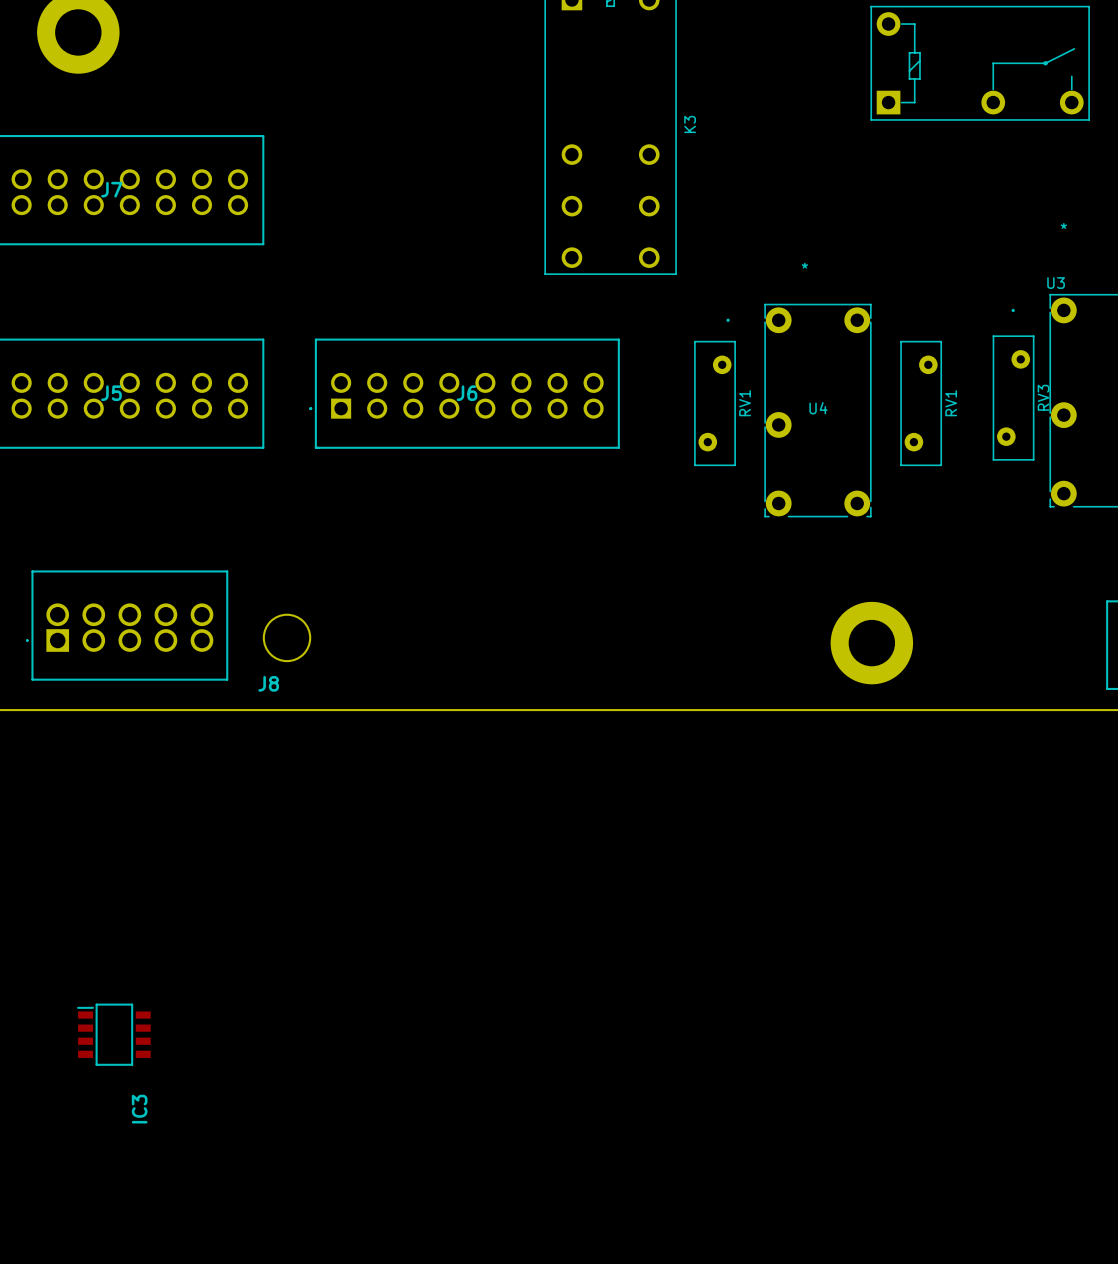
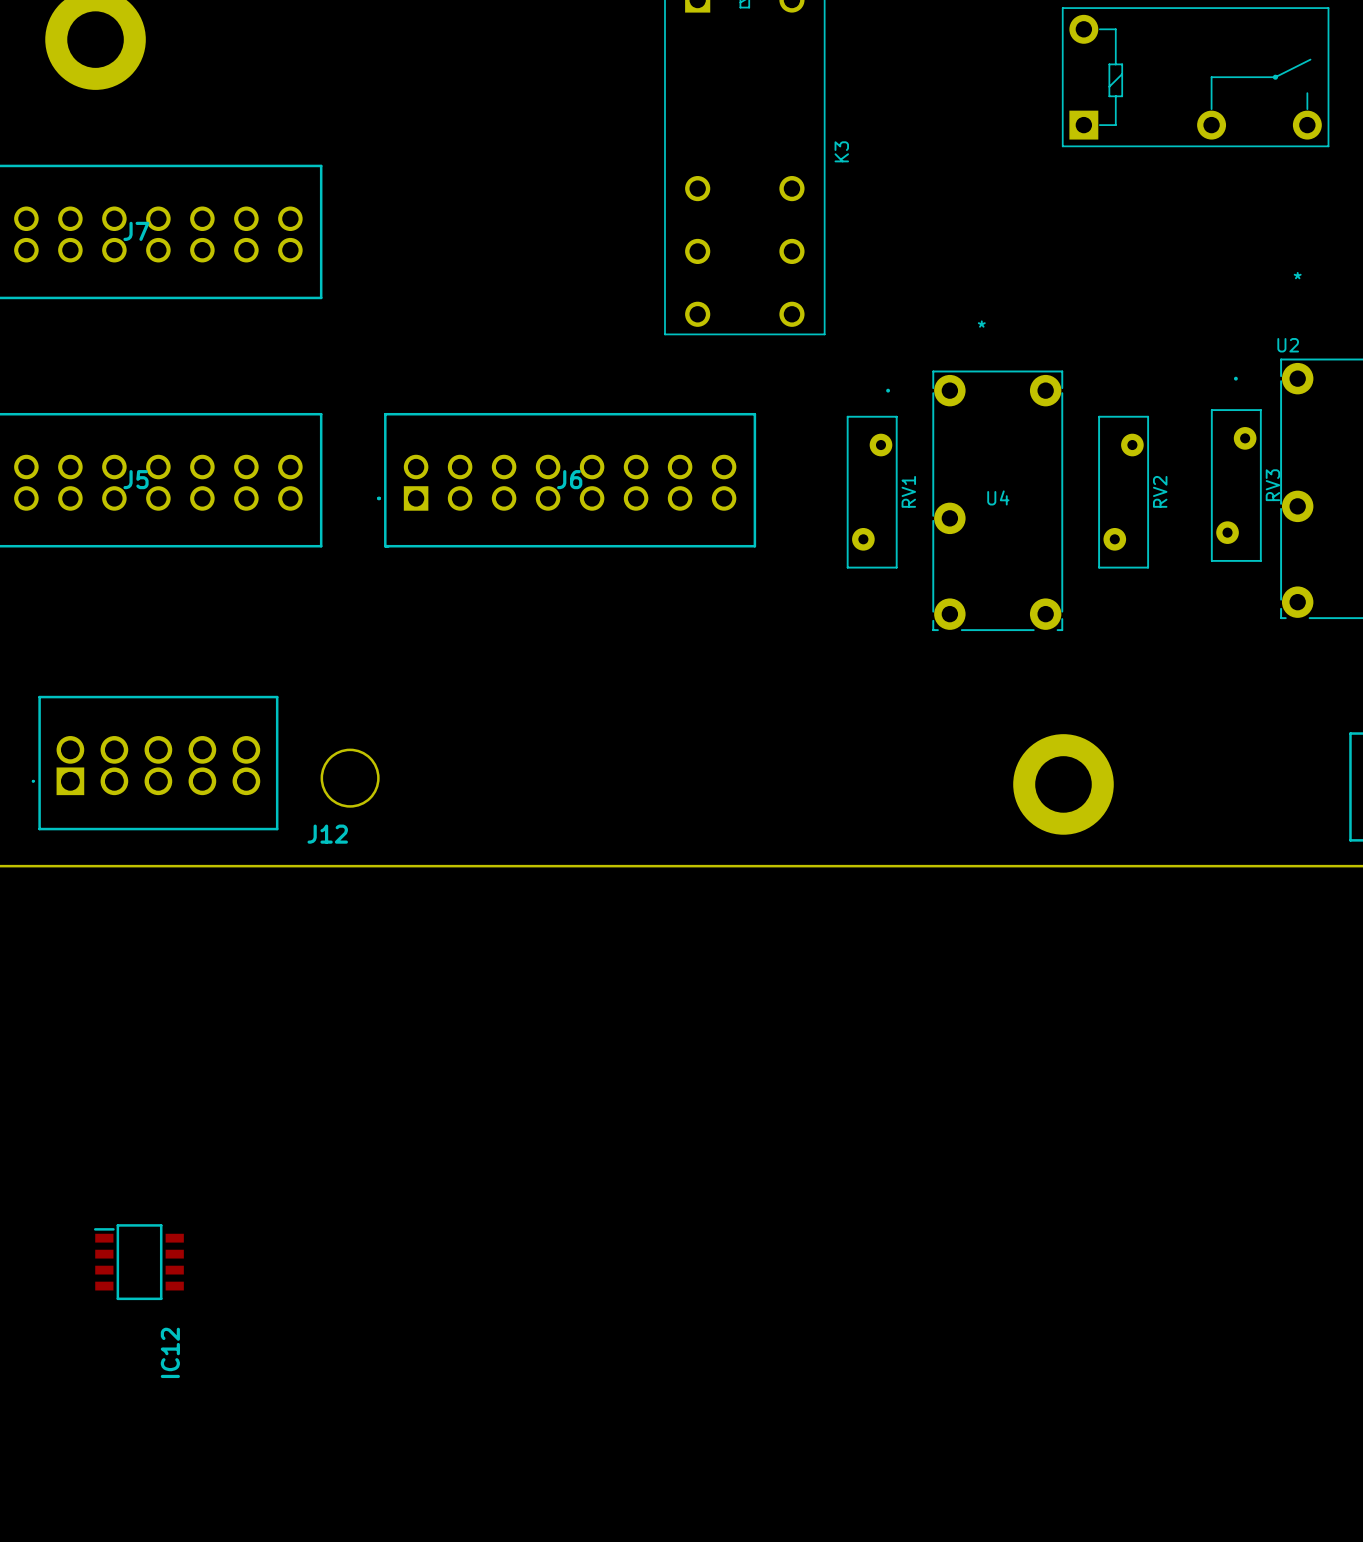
U3 name: U3 (1056, 283) -> U2 (1288, 345)
RV1 name: RV1 (951, 403) -> RV2 (1160, 491)
J8 name: J8 (268, 683) -> J12 (327, 834)
IC3 name: IC3 (139, 1109) -> IC12 (170, 1352)

